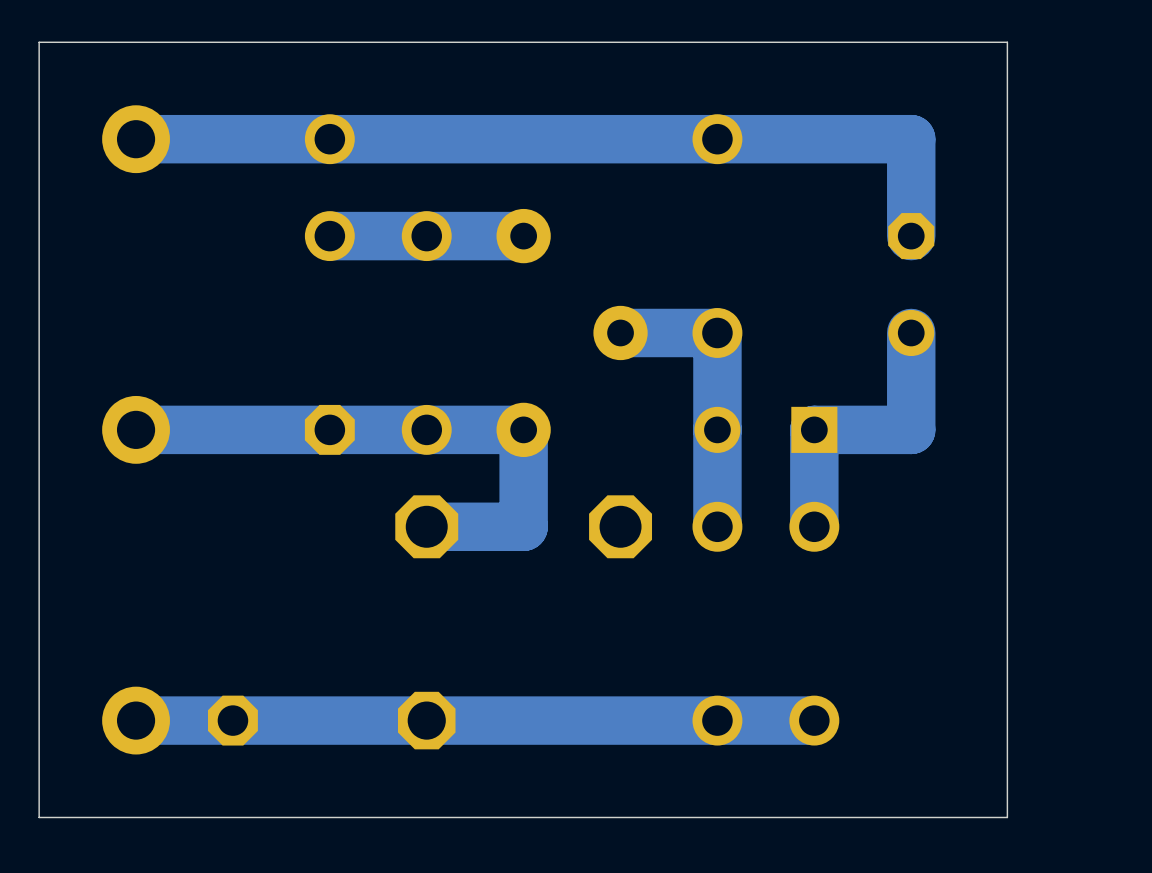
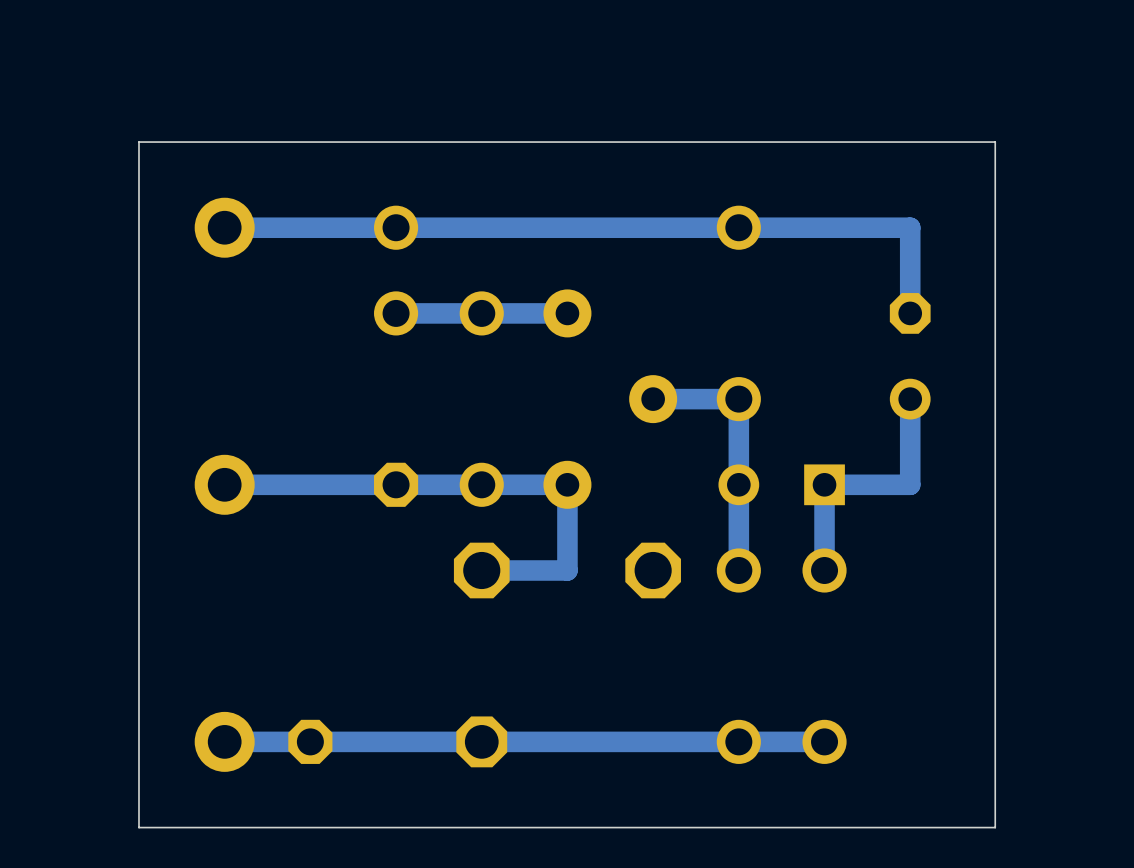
track width: thick (136, 139) (911, 139) (911, 236) -> thin (224, 227) (910, 227) (910, 313)
track width: thick (523, 236) (329, 236) -> thin (567, 313) (396, 313)
track width: thick (620, 332) (717, 332) (717, 526) -> thin (653, 399) (738, 399) (738, 570)
track width: thick (911, 332) (911, 429) (814, 429) (814, 526) -> thin (910, 399) (910, 484) (824, 484) (824, 570)
track width: thick (136, 429) (523, 429) (523, 526) (426, 526) -> thin (224, 484) (567, 484) (567, 570) (481, 570)
track width: thick (814, 720) (136, 720) -> thin (824, 741) (224, 741)

